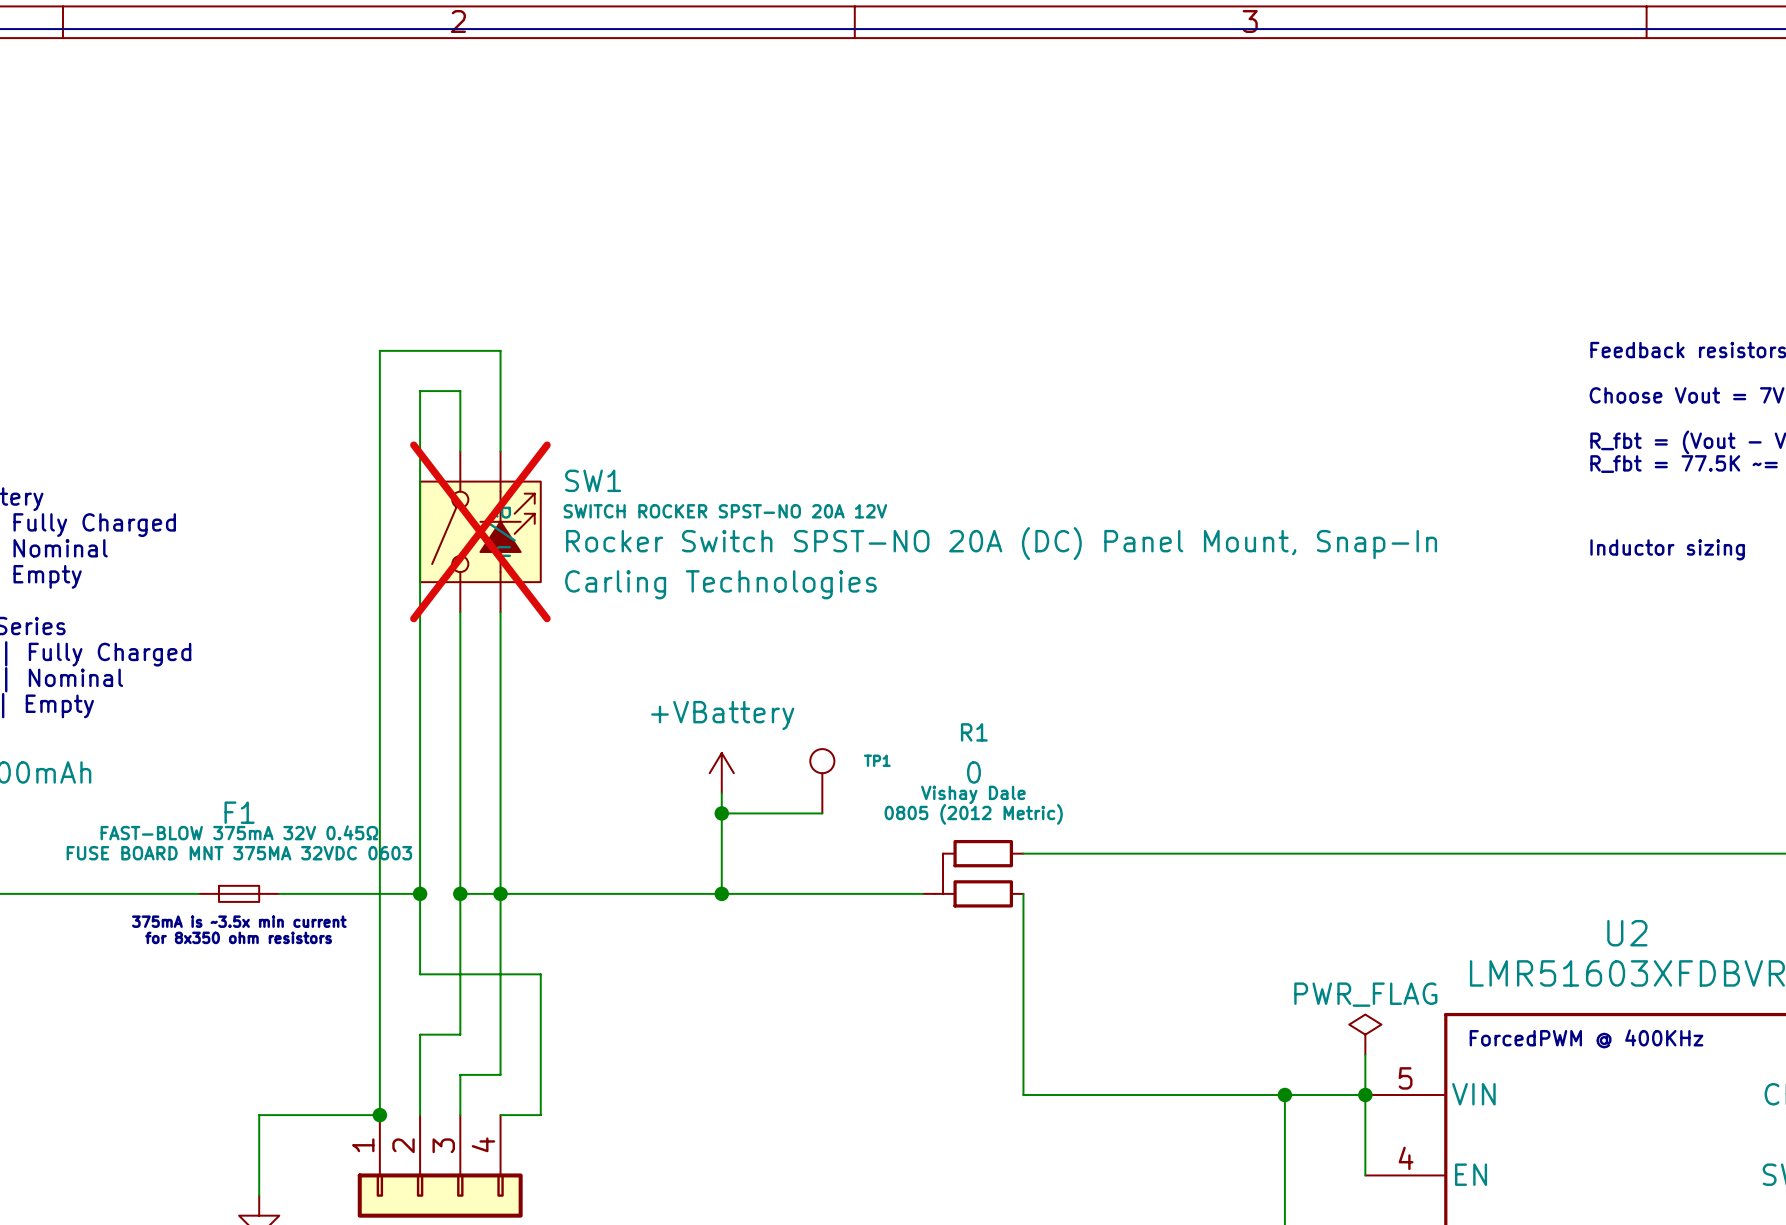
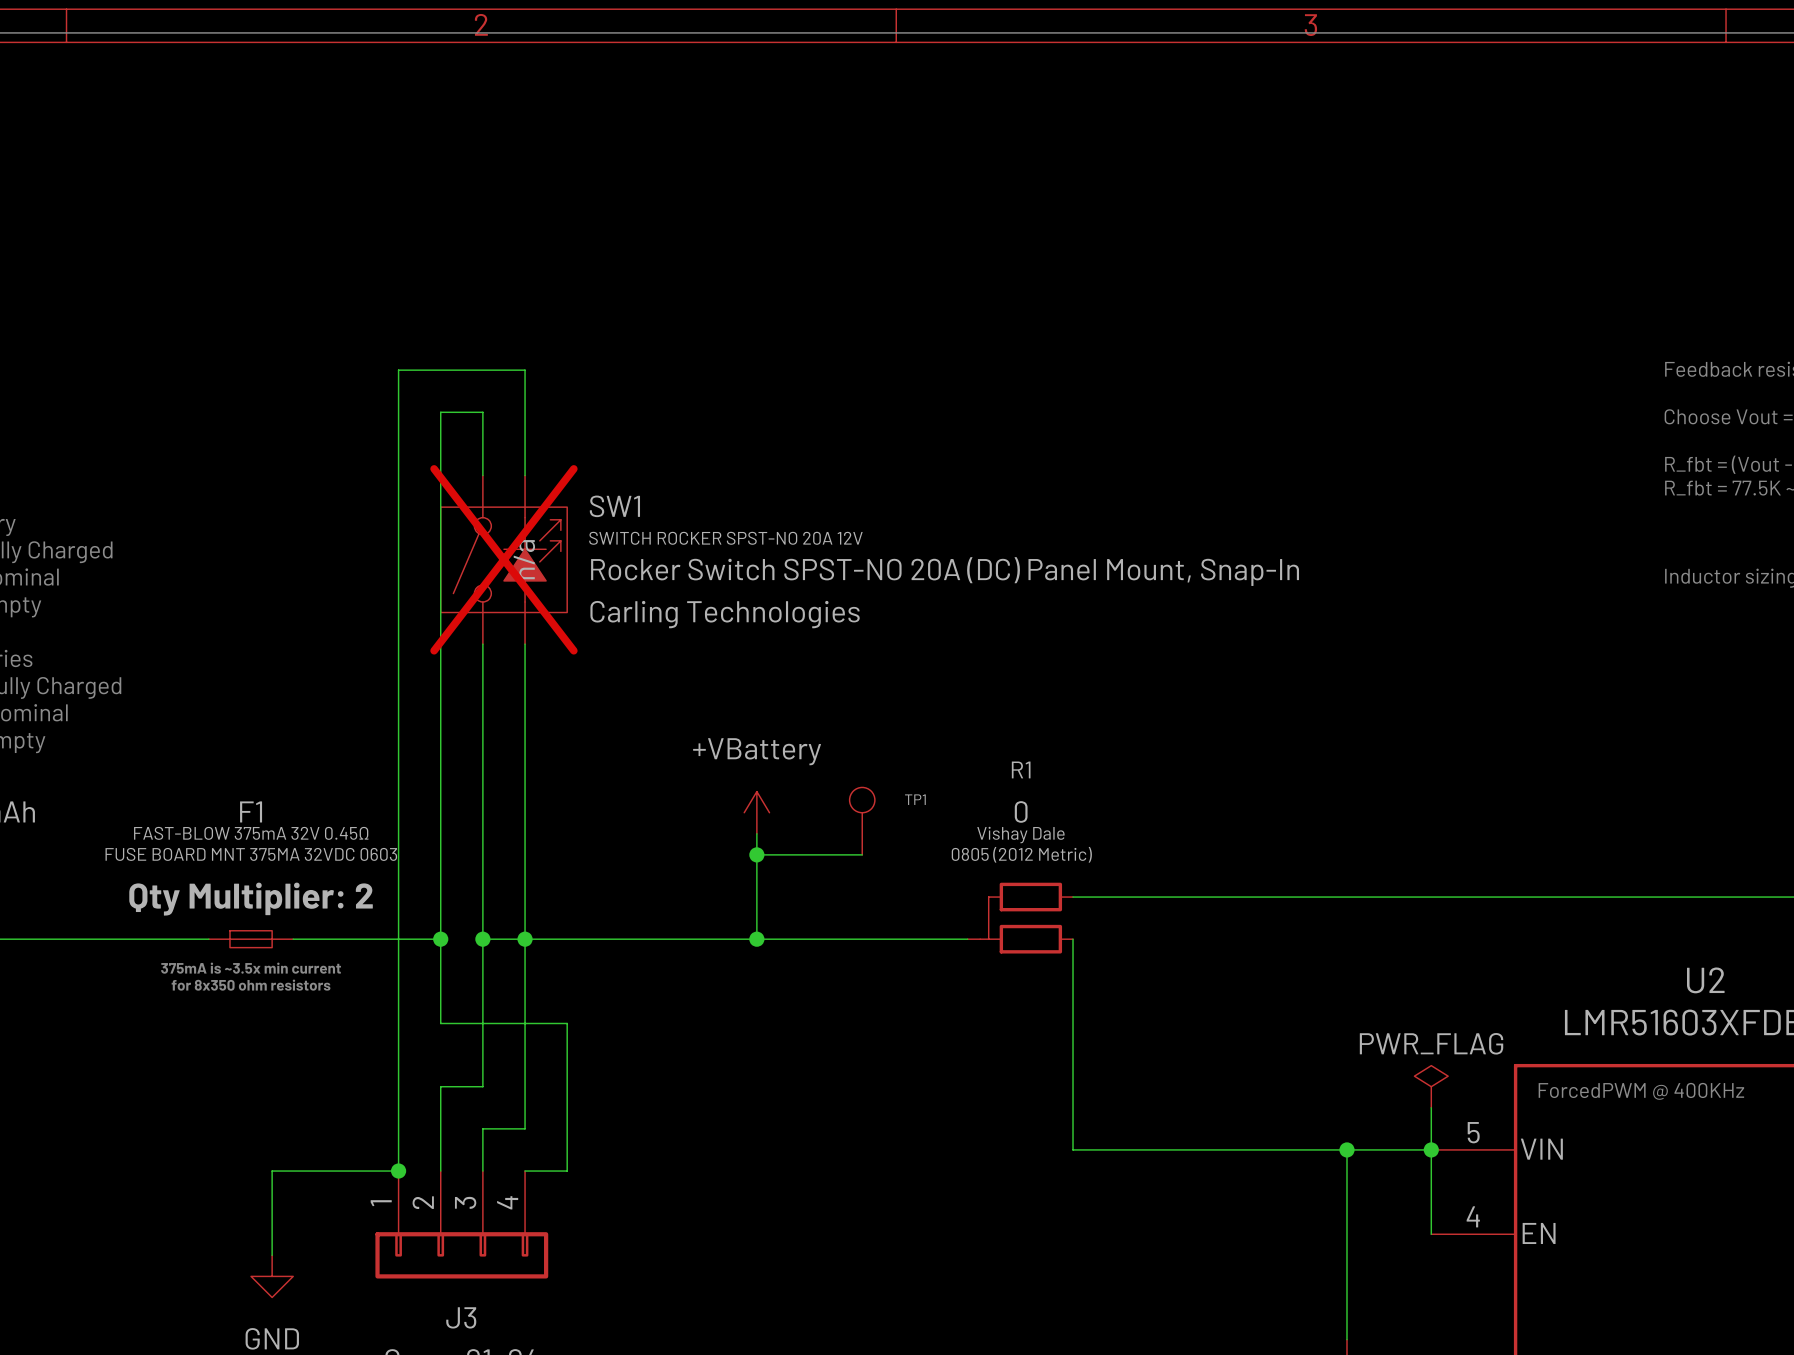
F1 name position: F1 (239, 812) -> F1 (251, 811)
F1 value position: FAST-BLOW 375mA 32V 0.45Ω (239, 832) -> FAST-BLOW 375mA 32V 0.45Ω (251, 833)
F1 text position: FUSE BOARD MNT 375MA 32VDC 0603 (239, 853) -> FUSE BOARD MNT 375MA 32VDC 0603 (251, 854)
F1 text: none -> Qty Multiplier: 2 (251, 899)

